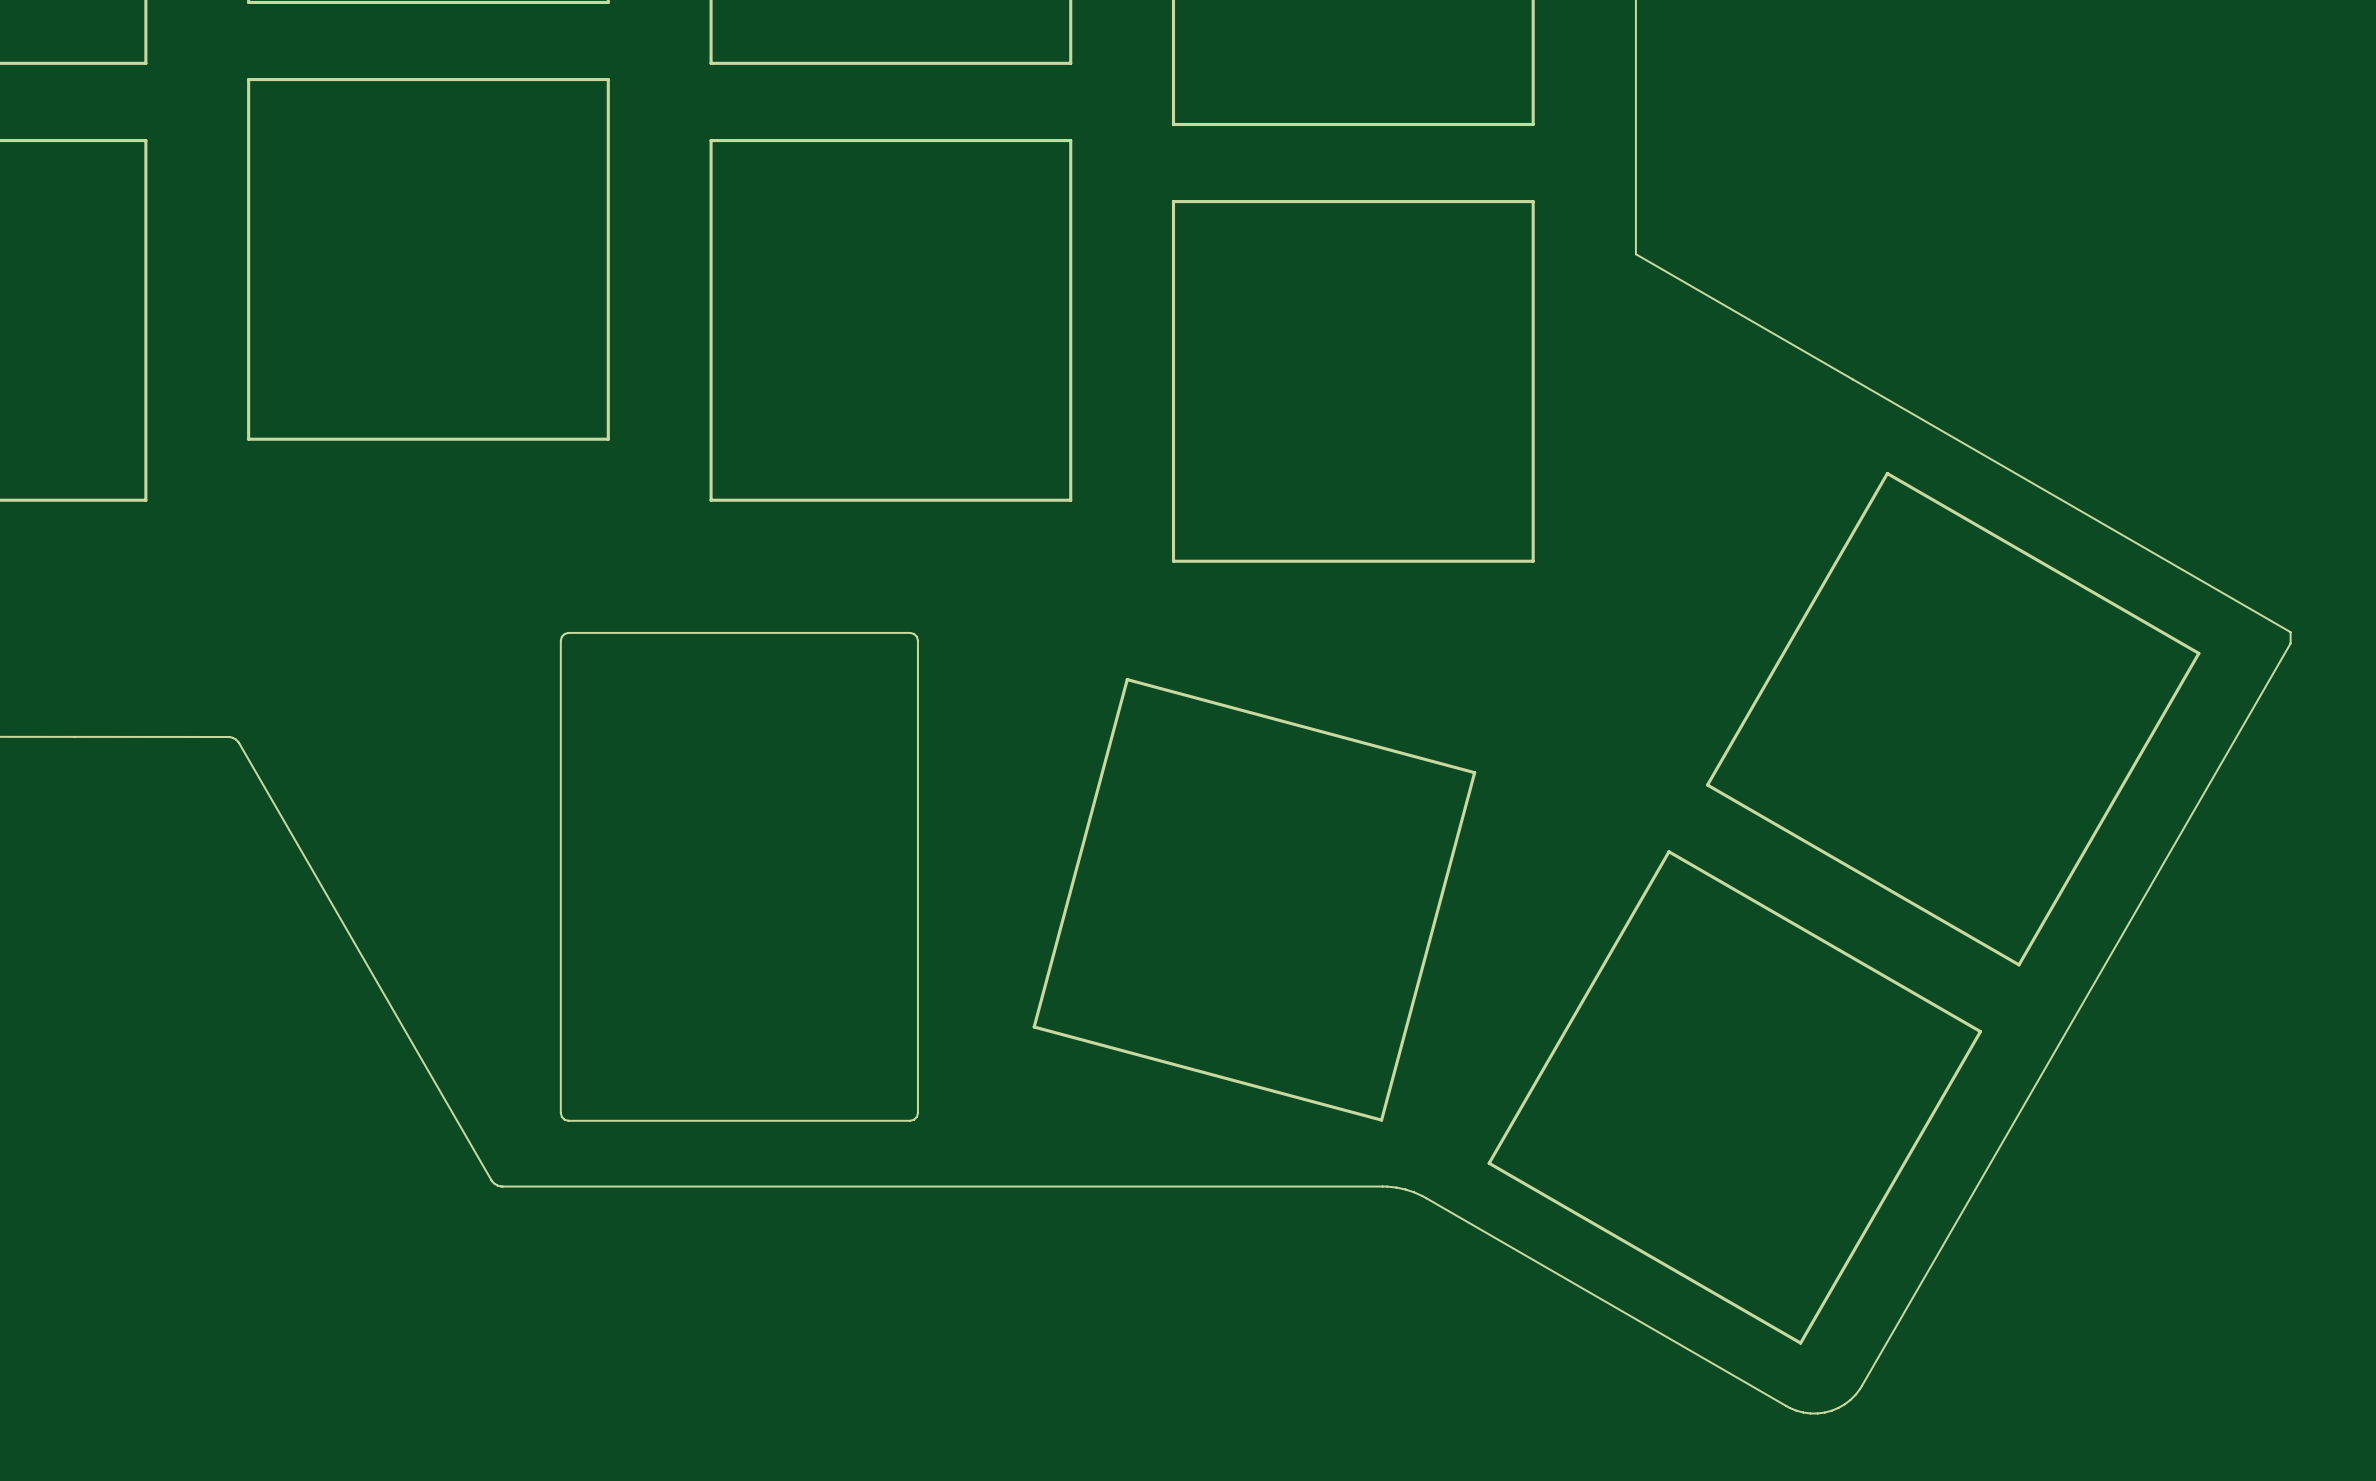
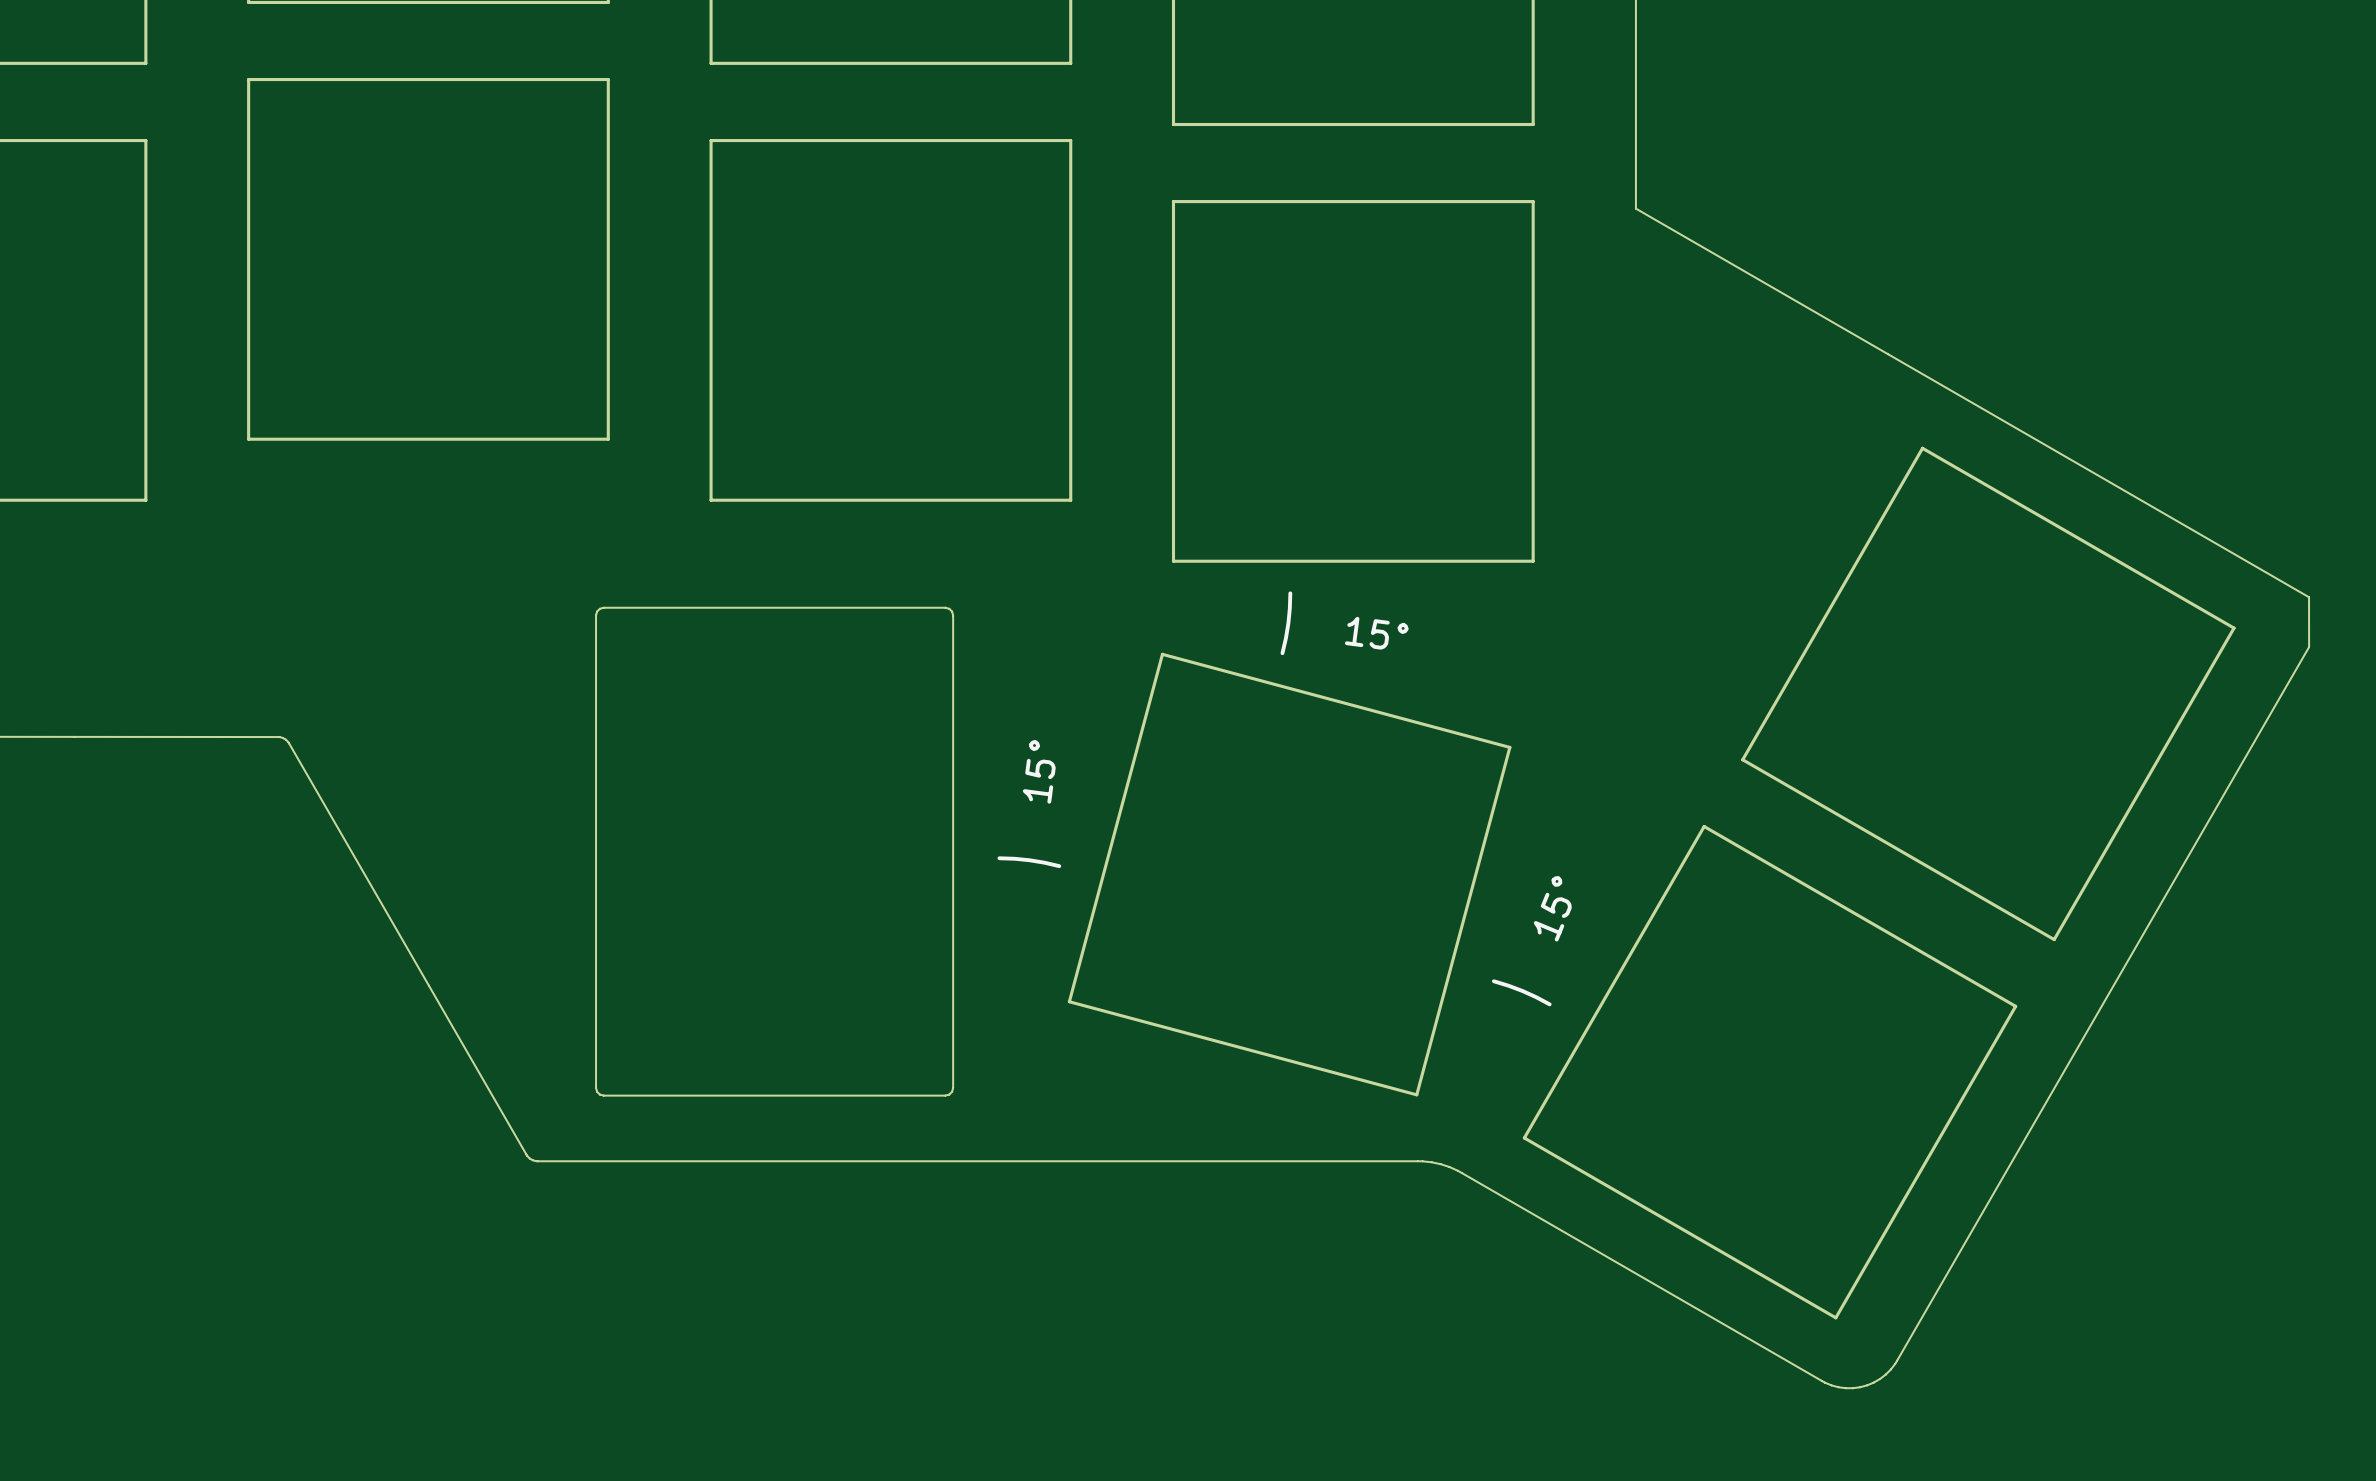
board edge: (1635, 208) (1635, 254) (2290, 632) (2290, 643) (1861, 1385) (1850, 1399) (1831, 1410) (1810, 1413) (1789, 1407) (1426, 1198) (1396, 1187) (497, 1185) (491, 1179) (239, 743) (236, 739) (228, 737) -> (1635, 208) (2309, 597) (2309, 647) (1895, 1363) (1885, 1374) (1867, 1385) (1845, 1388) (1824, 1382) (1457, 1170) (1431, 1162) (532, 1160) (526, 1154) (288, 742) (279, 737) (228, 737)
line: none -> (1290, 593) (1288, 623) (1282, 653)
board edge: (910, 632) (914, 633) (917, 640) (916, 1116) (910, 1120) (564, 1119) (560, 1113) (561, 636) (568, 632) (910, 632) -> (945, 607) (949, 608) (953, 615) (952, 1091) (945, 1095) (599, 1094) (596, 1087) (597, 611) (603, 607) (945, 607)
text: none -> 15° (1376, 633)
drawing position: (1953, 719) -> (1988, 693)
text: none -> 15° (1039, 771)
line: none -> (999, 858) (1029, 860) (1059, 866)
drawing position: (1254, 899) -> (1289, 874)
text: none -> 15° (1552, 908)
line: none -> (1493, 981) (1522, 990) (1549, 1004)
drawing position: (1734, 1097) -> (1770, 1072)

